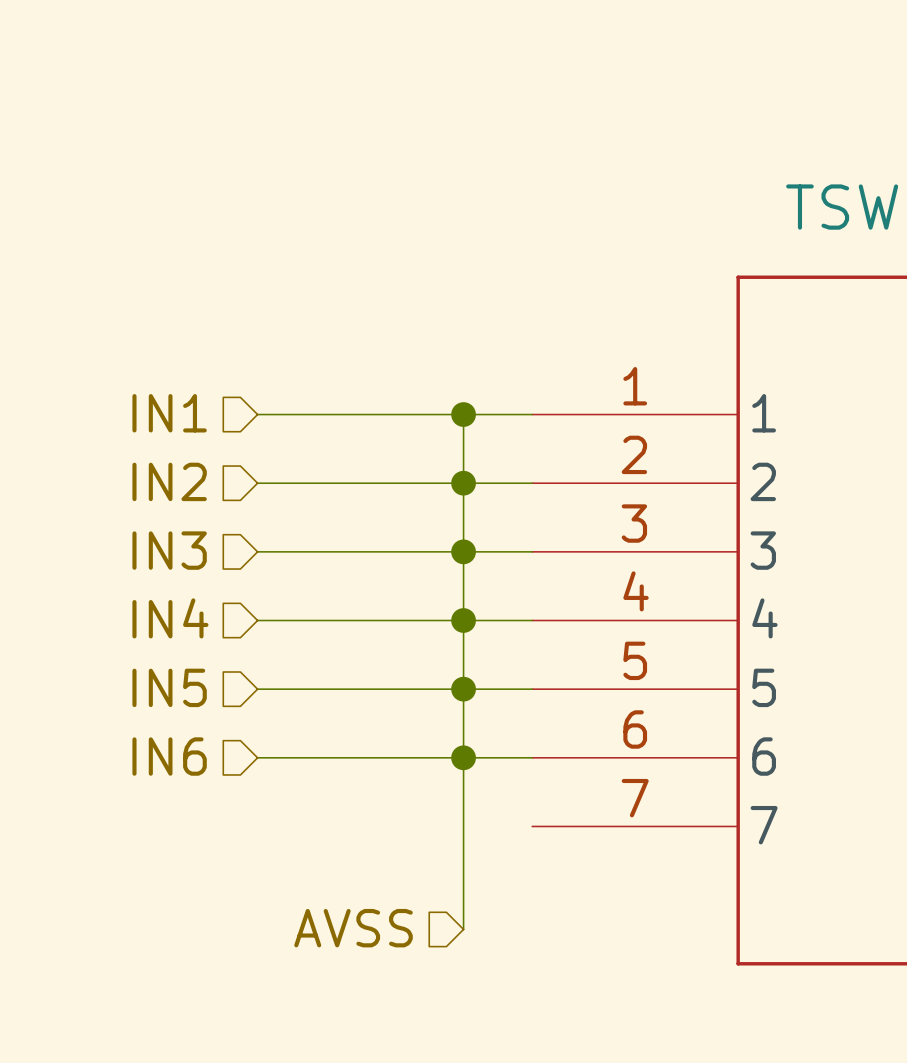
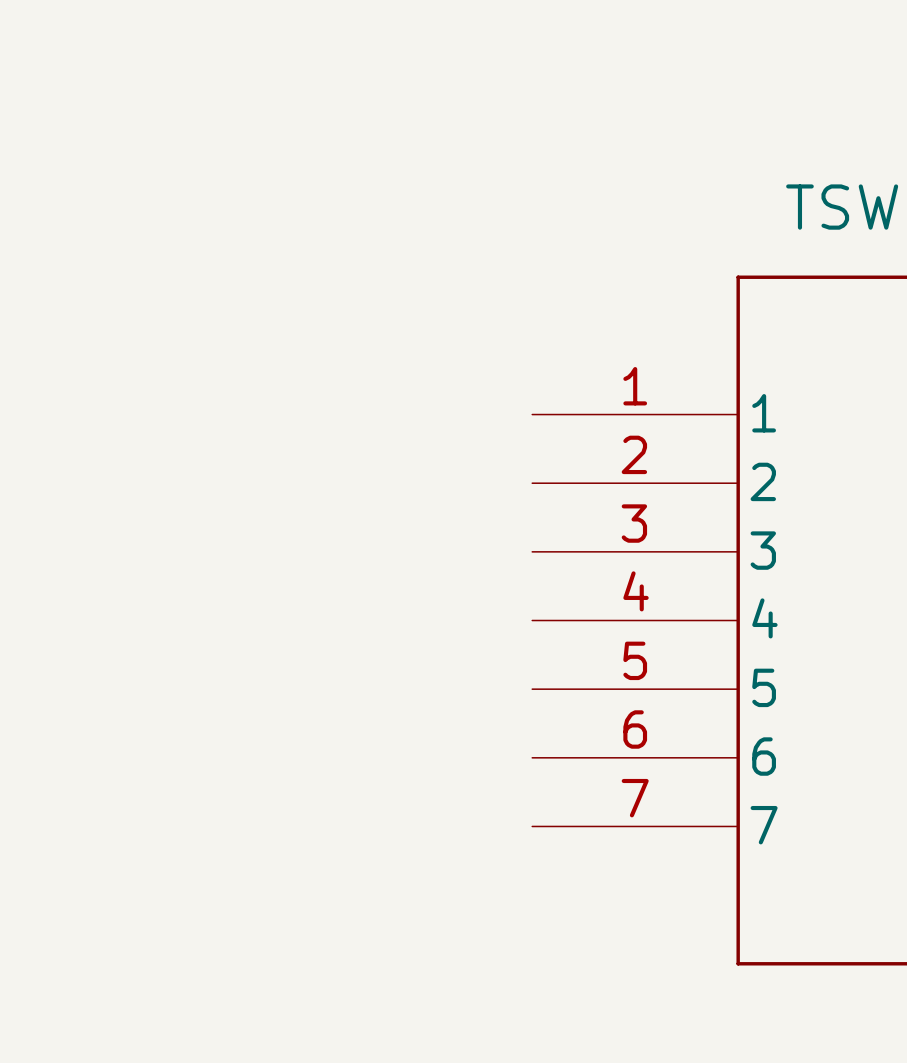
hierarchical label: IN1 (169, 413) -> none
wire: (257, 414) (532, 414) -> none
wire: (463, 414) (463, 929) -> none
junction: (463, 414) -> none
hierarchical label: IN2 (169, 481) -> none
wire: (257, 483) (532, 483) -> none
junction: (463, 483) -> none
hierarchical label: IN3 (169, 550) -> none
wire: (257, 551) (532, 551) -> none
junction: (463, 551) -> none
hierarchical label: IN4 (170, 618) -> none
wire: (257, 620) (532, 620) -> none
junction: (463, 620) -> none
hierarchical label: IN5 (169, 687) -> none
wire: (257, 689) (532, 689) -> none
junction: (463, 689) -> none
hierarchical label: IN6 (169, 756) -> none
wire: (257, 757) (532, 757) -> none
junction: (463, 757) -> none
hierarchical label: AVSS (353, 928) -> none

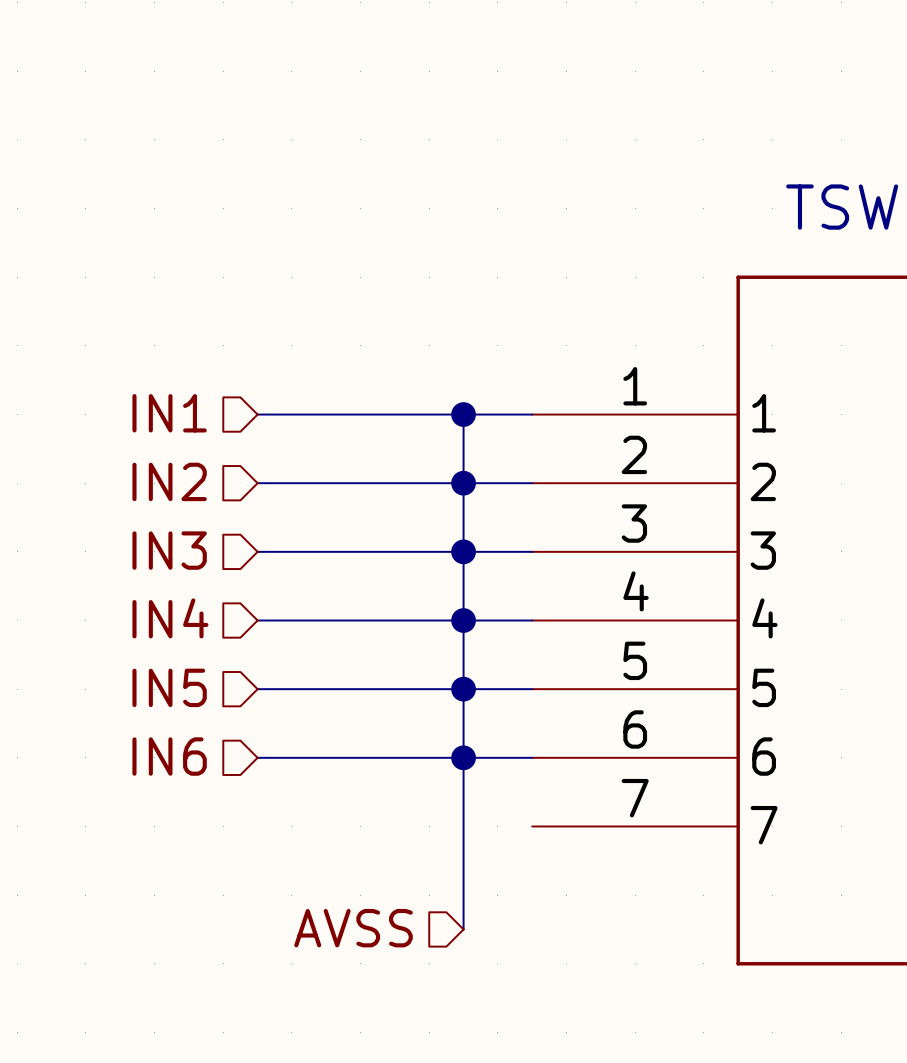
hierarchical label: none -> IN1 (169, 413)
wire: none -> (257, 414) (532, 414)
wire: none -> (463, 414) (463, 929)
junction: none -> (463, 414)
hierarchical label: none -> IN2 (169, 481)
wire: none -> (257, 483) (532, 483)
junction: none -> (463, 483)
hierarchical label: none -> IN3 (169, 550)
wire: none -> (257, 551) (532, 551)
junction: none -> (463, 551)
hierarchical label: none -> IN4 (170, 618)
wire: none -> (257, 620) (532, 620)
junction: none -> (463, 620)
hierarchical label: none -> IN5 (169, 687)
wire: none -> (257, 689) (532, 689)
junction: none -> (463, 689)
hierarchical label: none -> IN6 (169, 756)
wire: none -> (257, 757) (532, 757)
junction: none -> (463, 757)
hierarchical label: none -> AVSS (353, 928)

